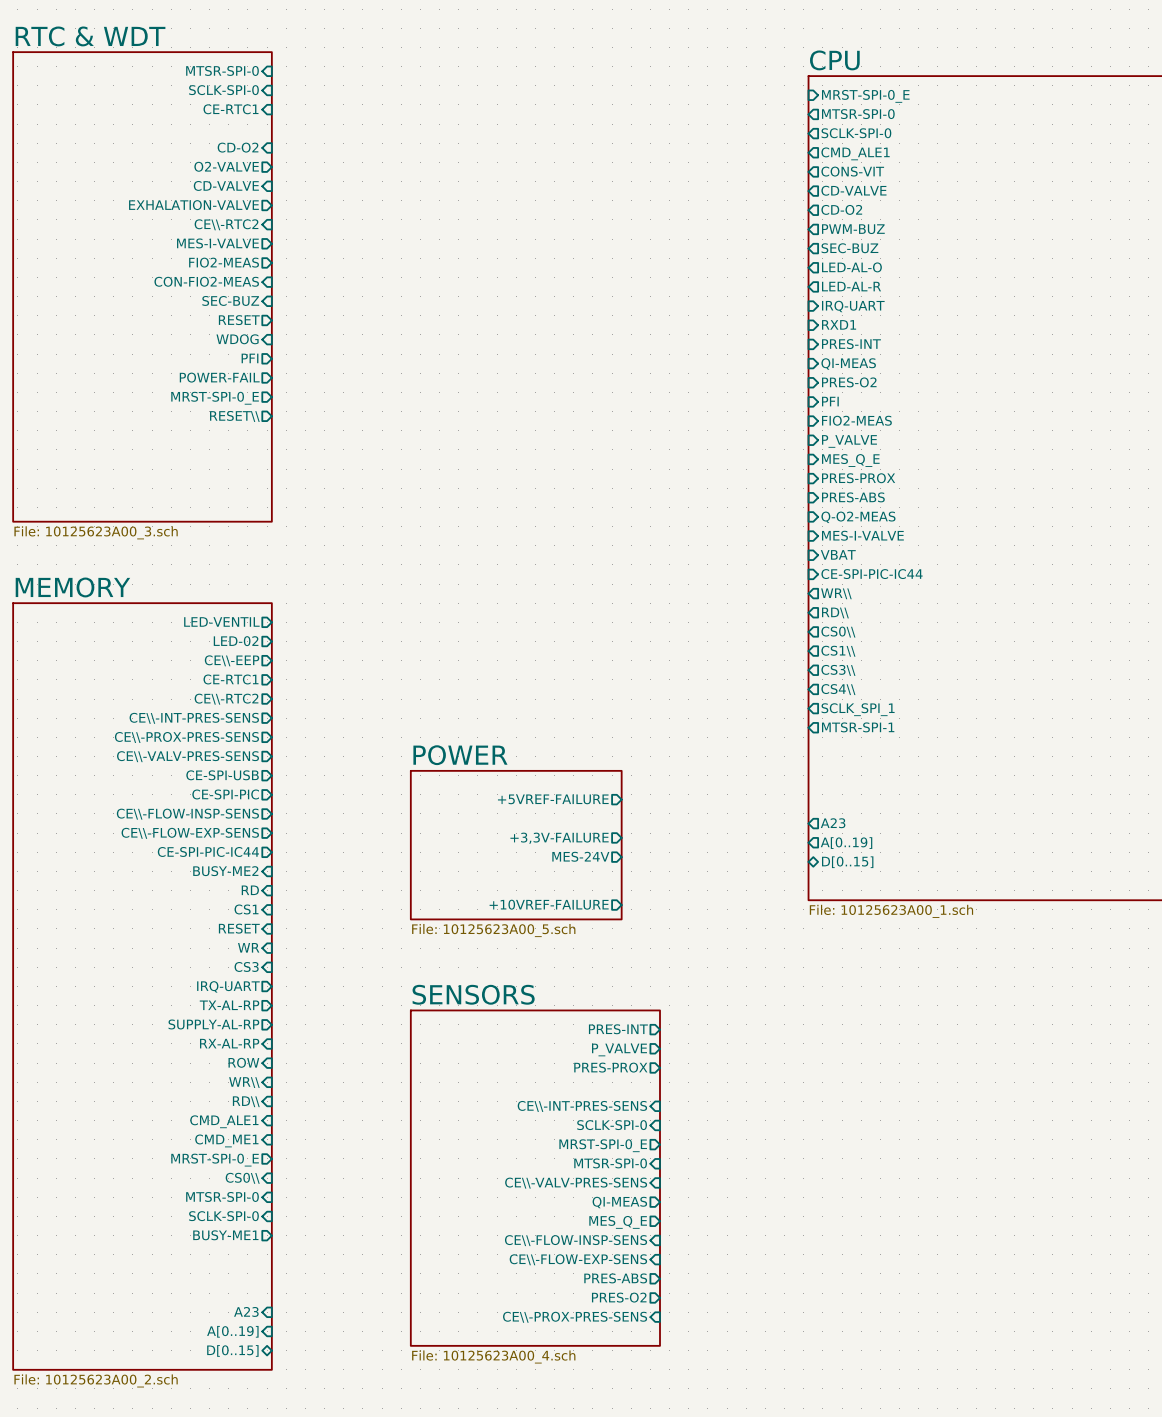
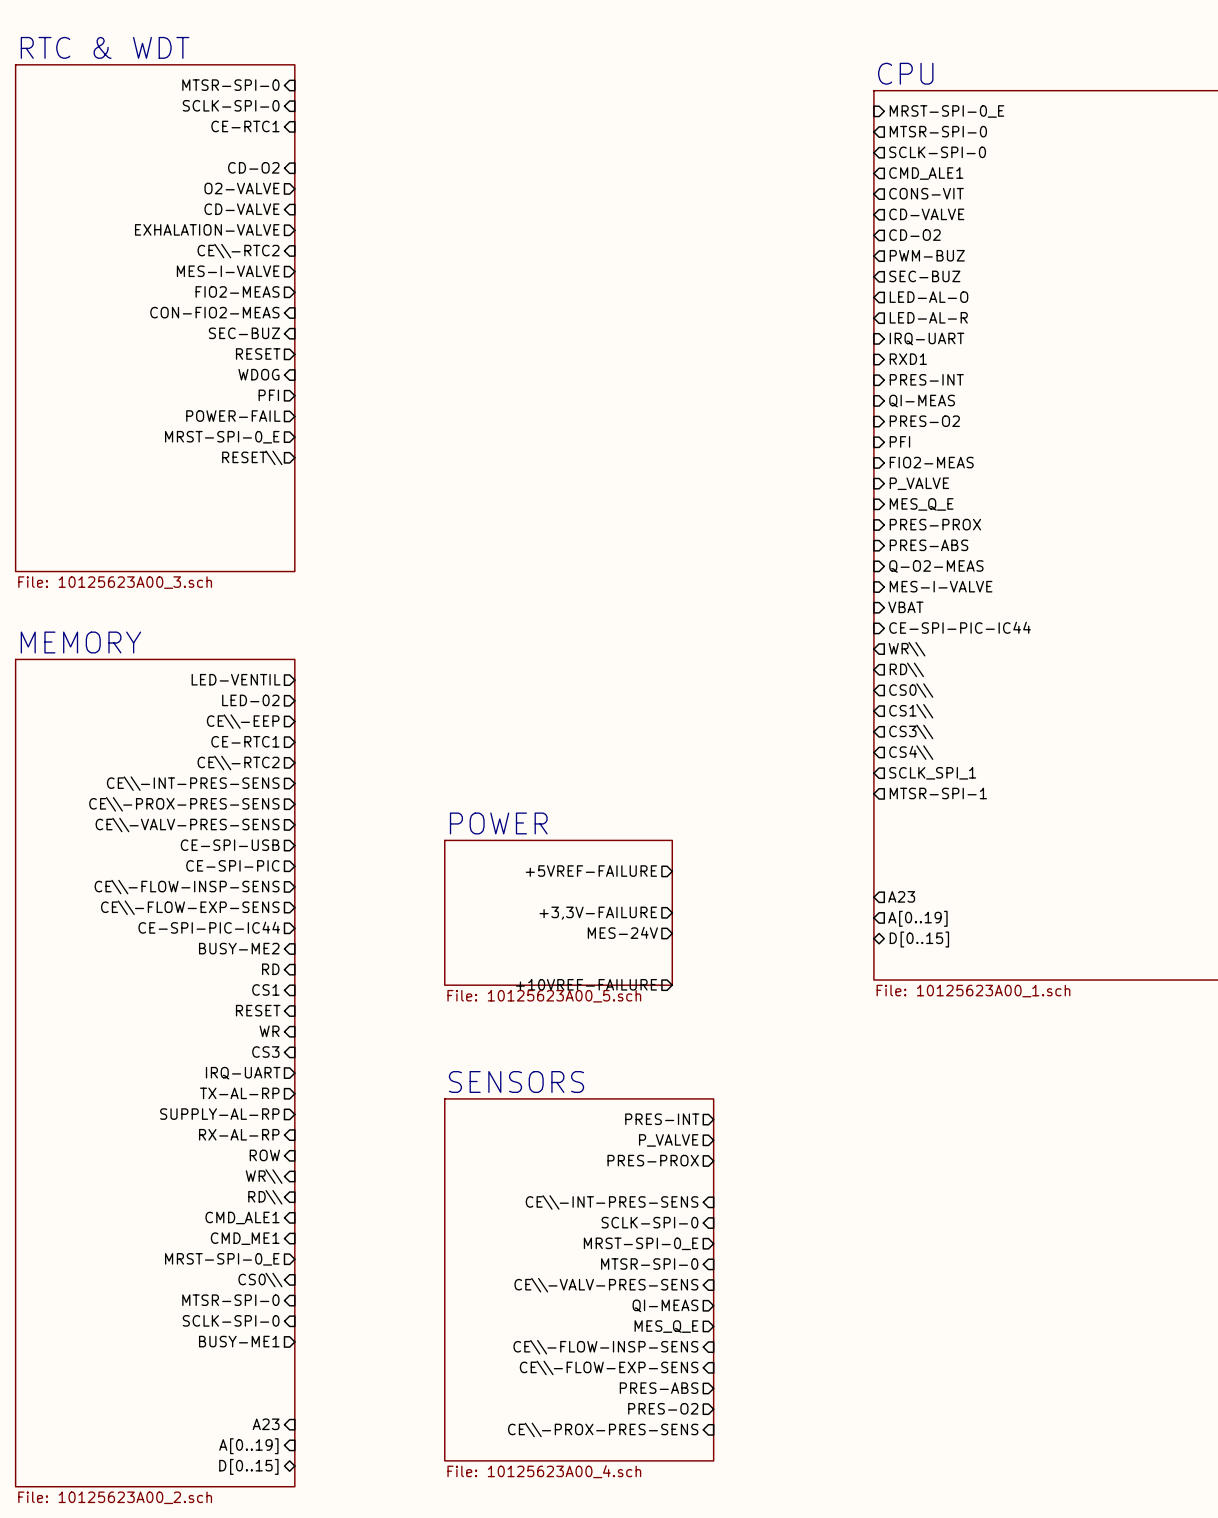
sheet POWER shape: [410, 770, 622, 920] -> [444, 840, 673, 986]

